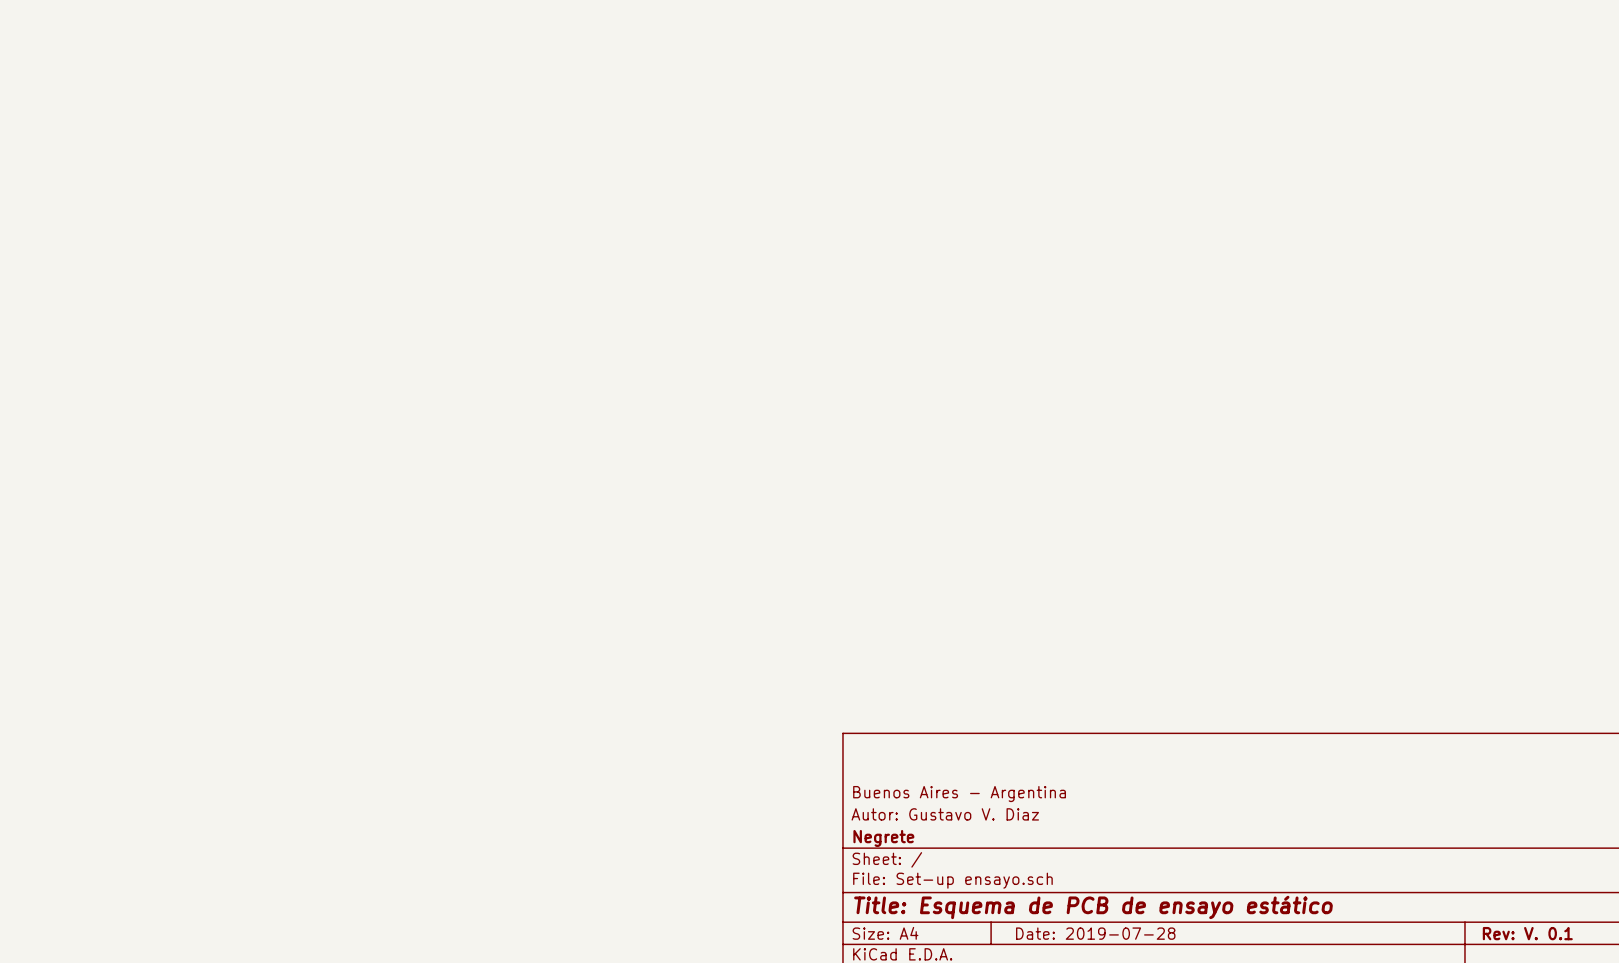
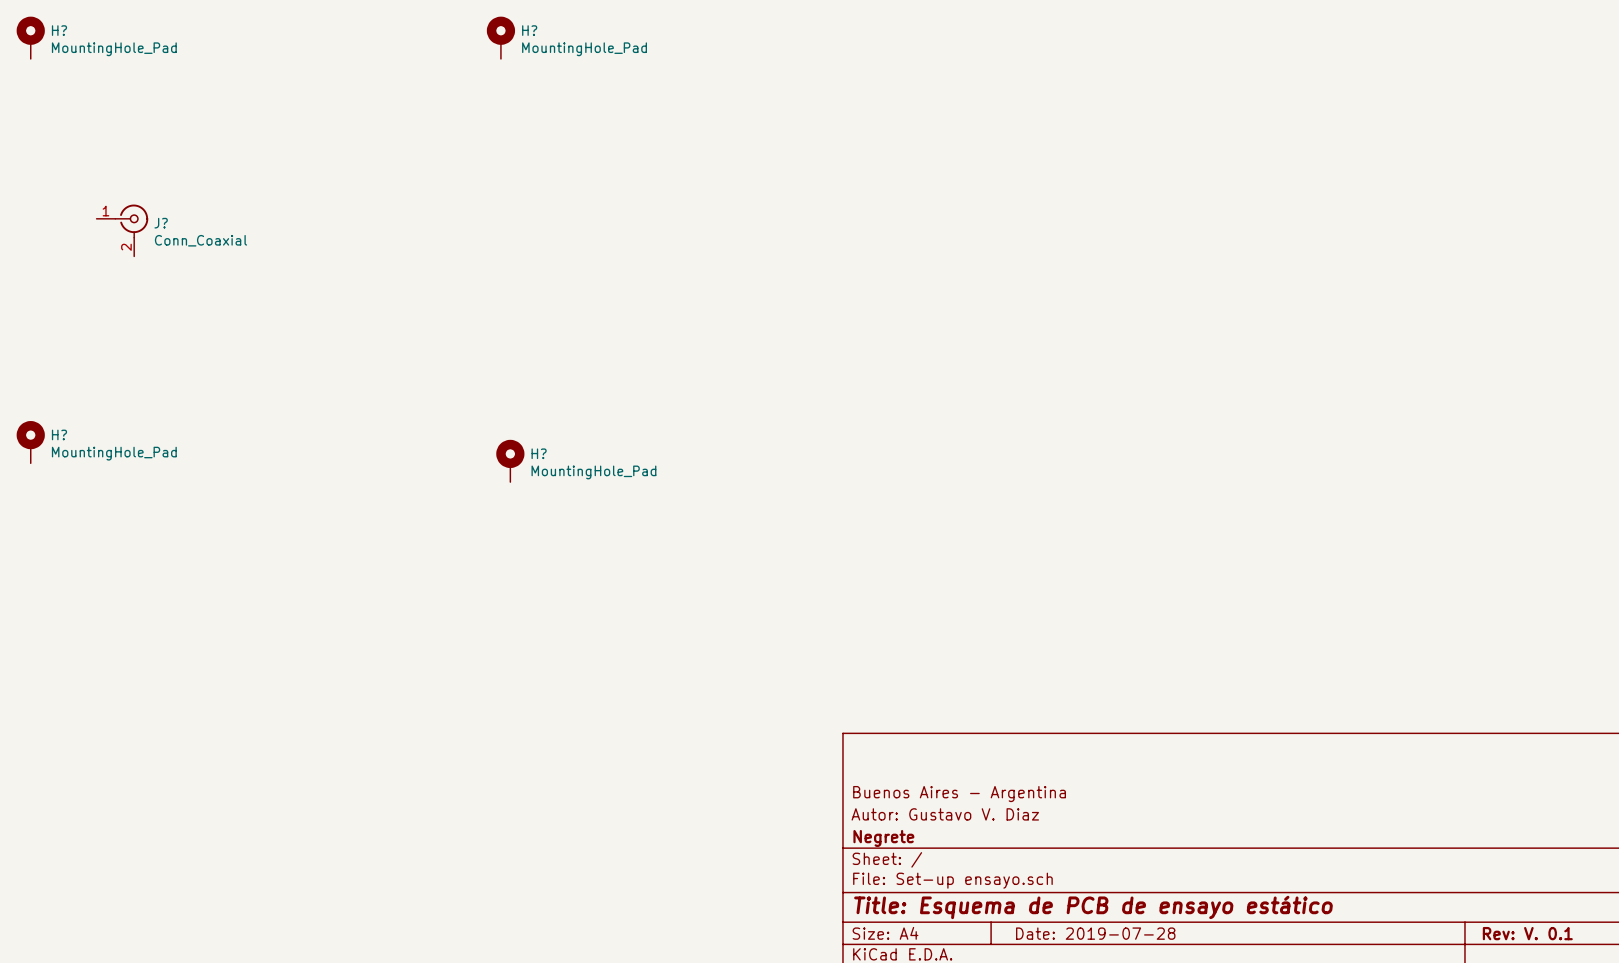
H?: none -> MountingHole_Pad (30, 37)
H?: none -> MountingHole_Pad (500, 37)
J?: none -> Conn_Coaxial (122, 230)
H?: none -> MountingHole_Pad (30, 442)
H?: none -> MountingHole_Pad (510, 460)

